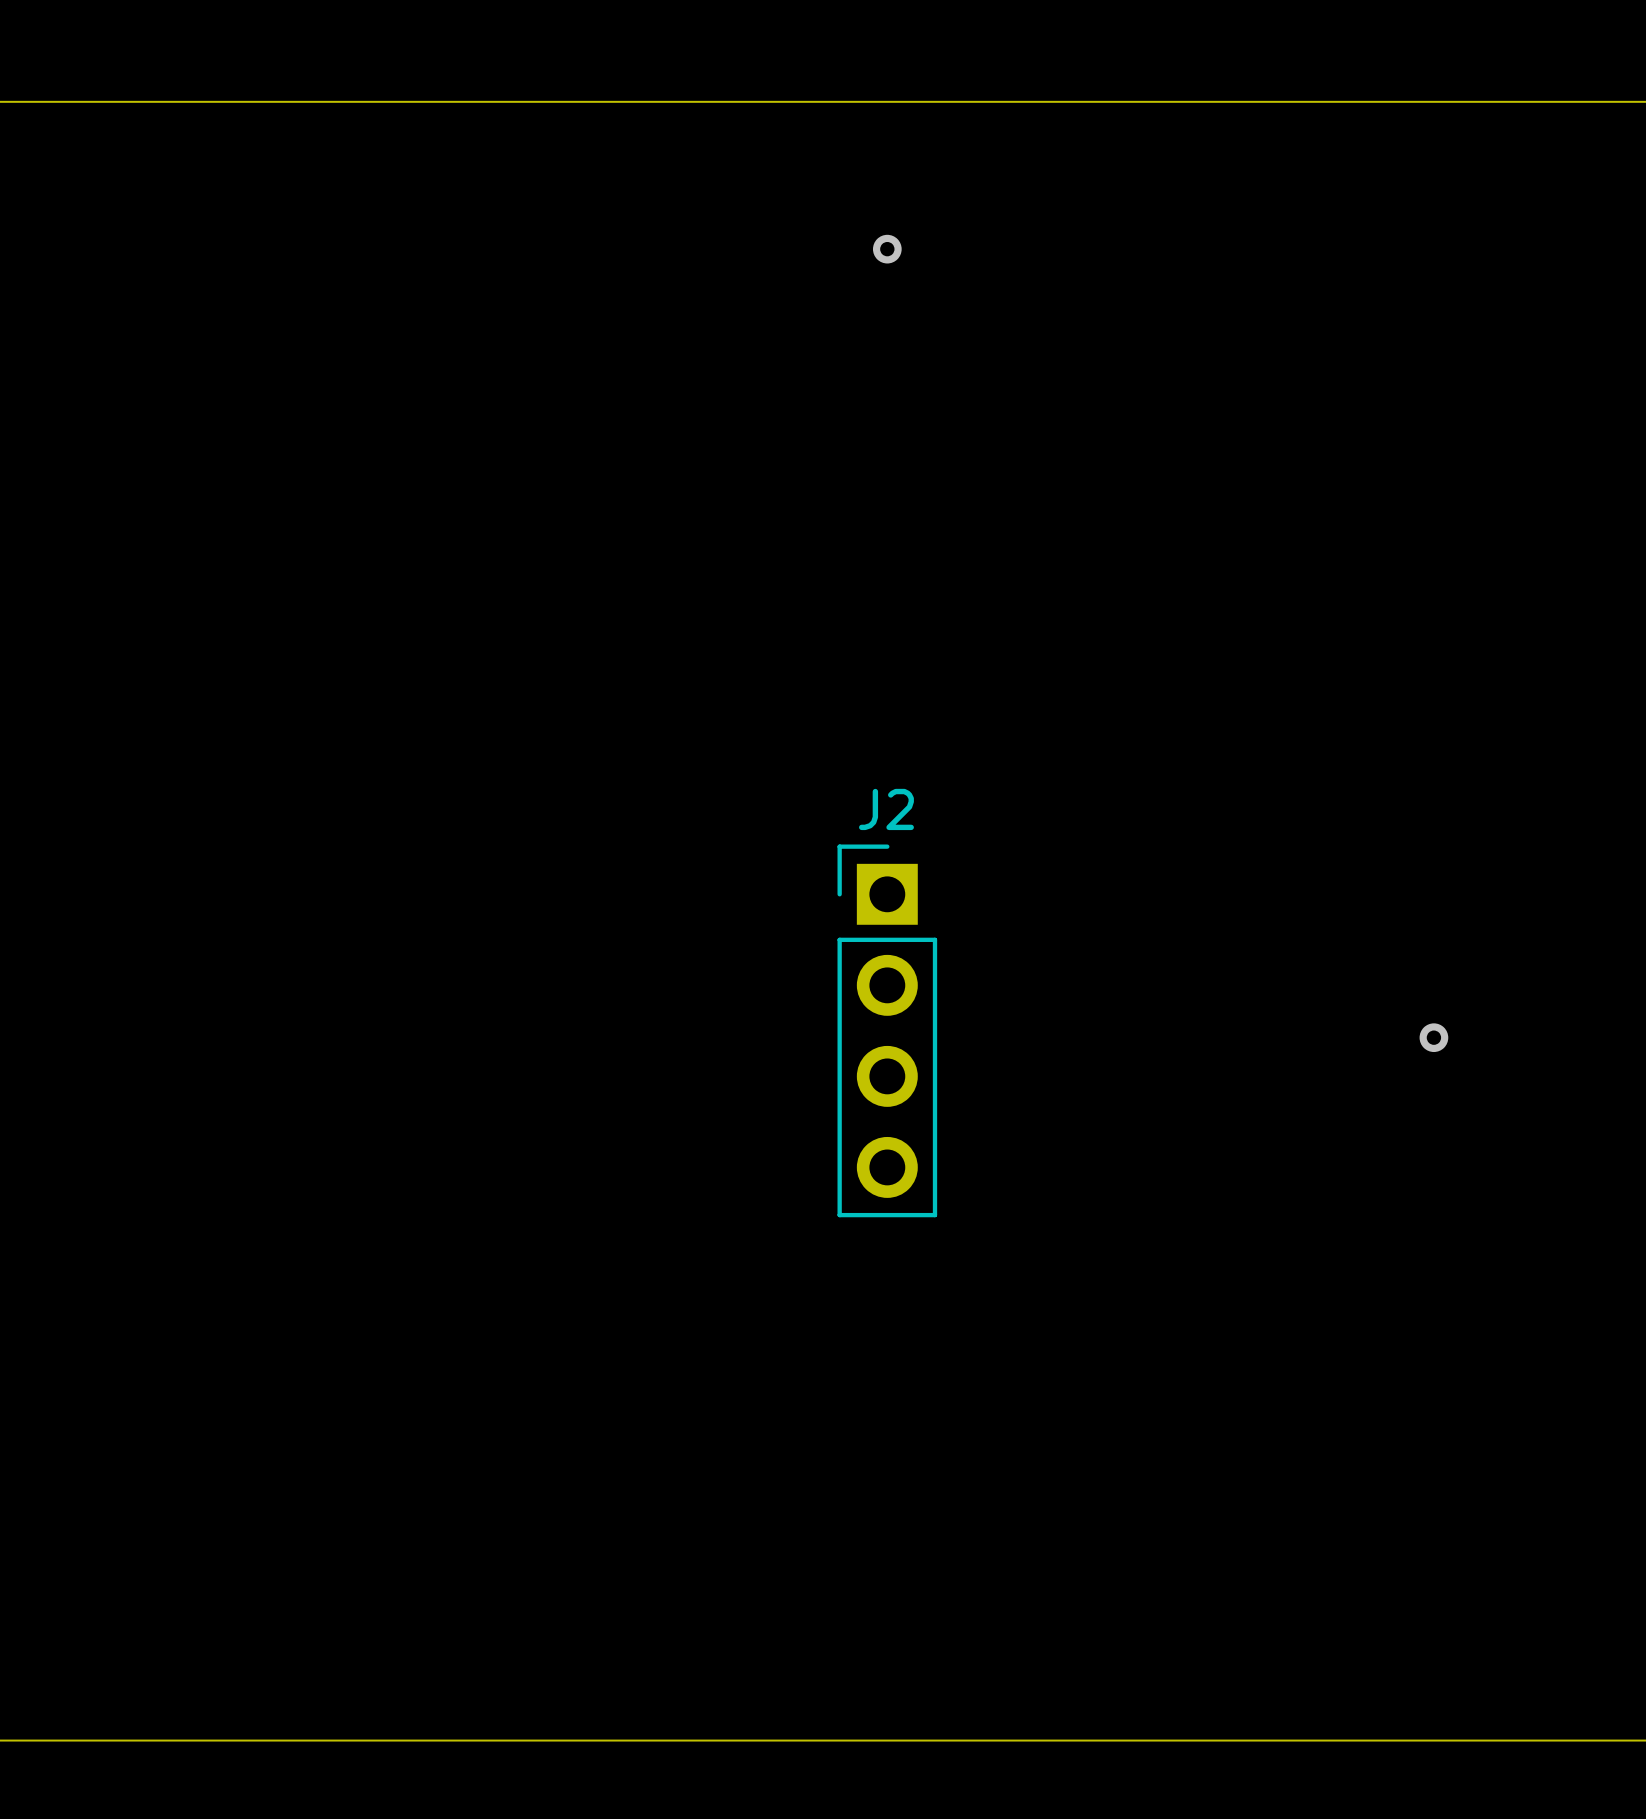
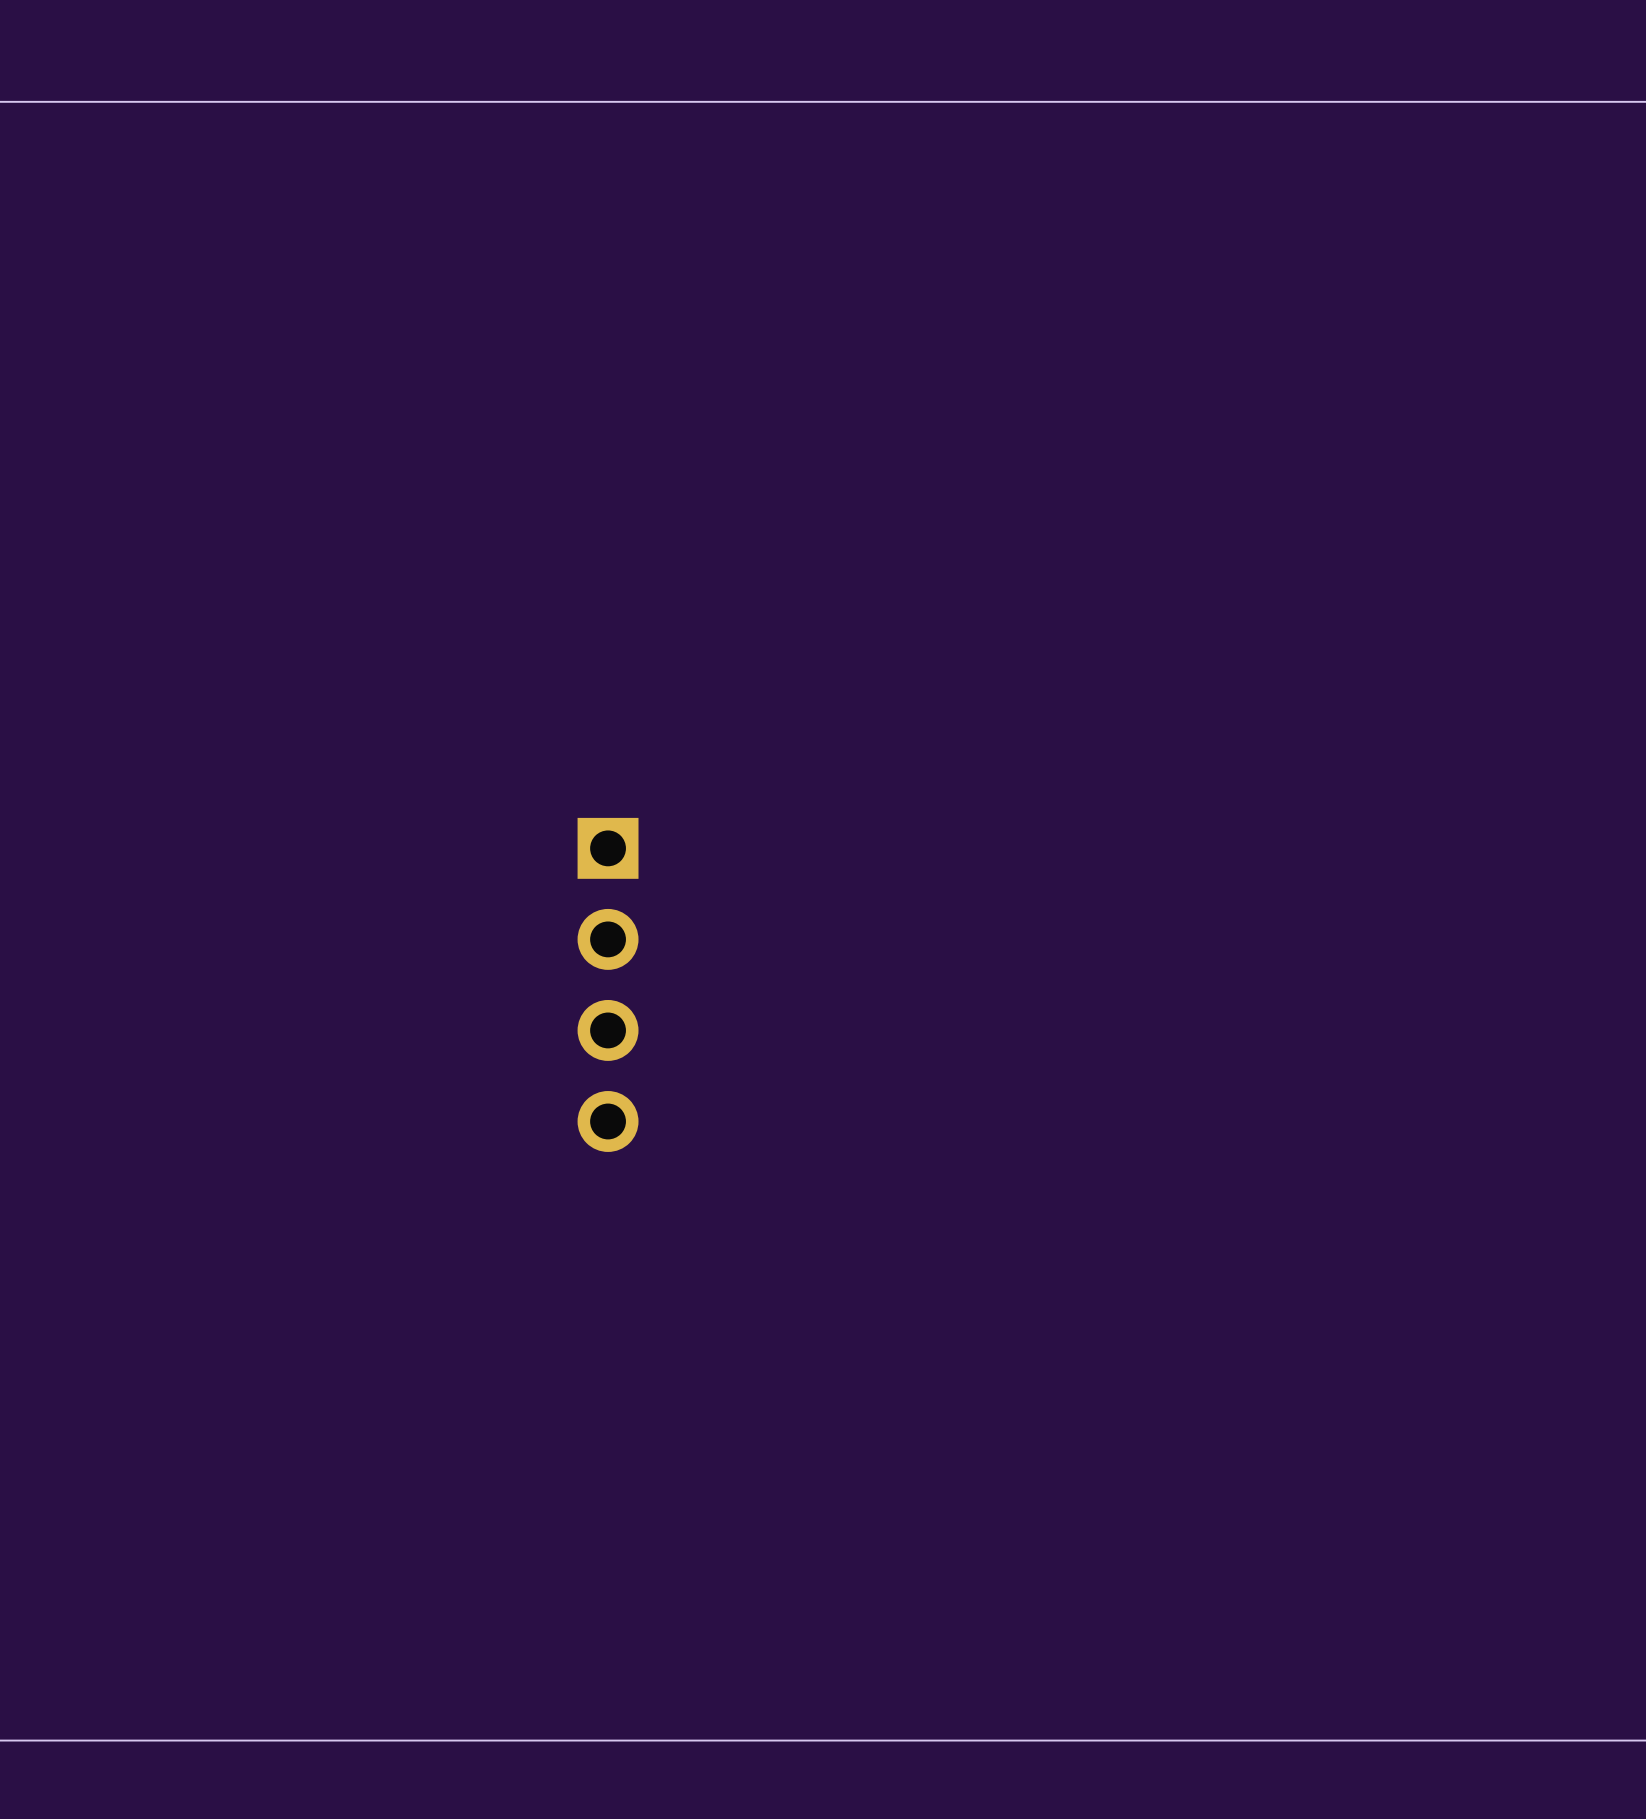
via: (887, 249) -> none
J2 side: bottom (887, 1030) -> top (608, 984)
via: (1433, 1037) -> none

